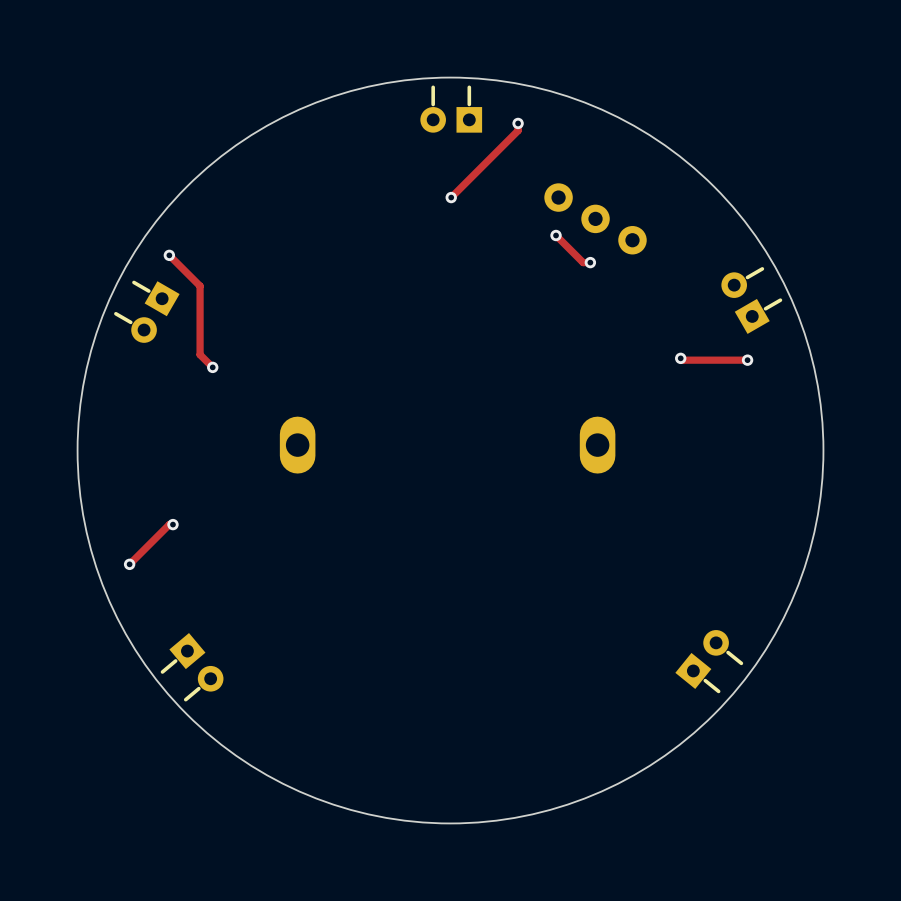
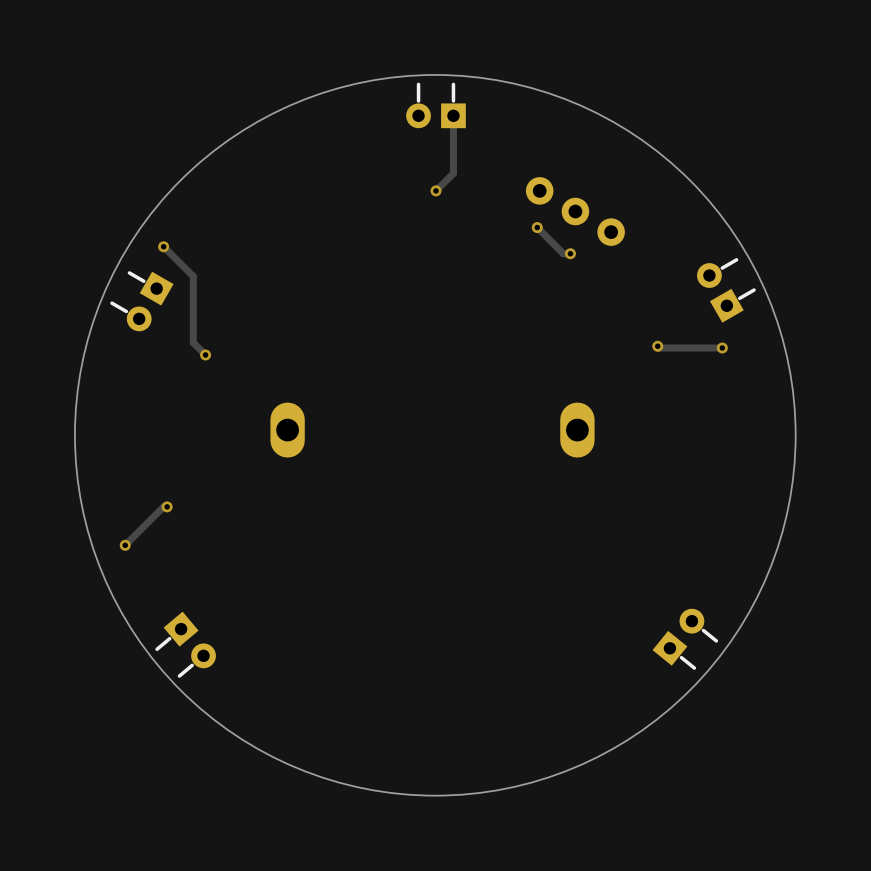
track: (518, 123) (518, 130) (469, 179) -> (453, 115) (453, 173)
via: (518, 123) -> none

